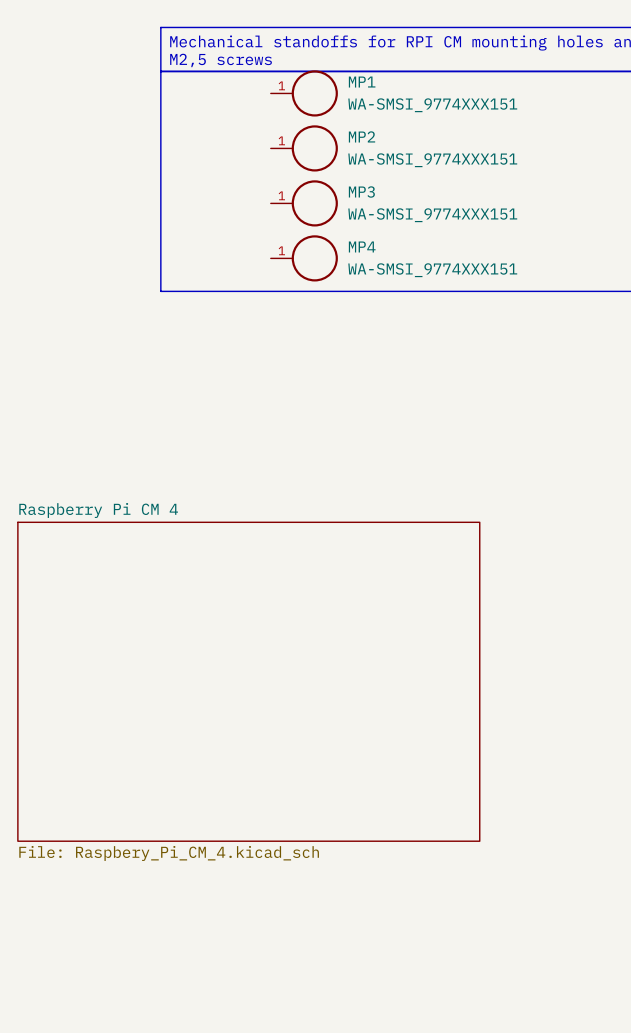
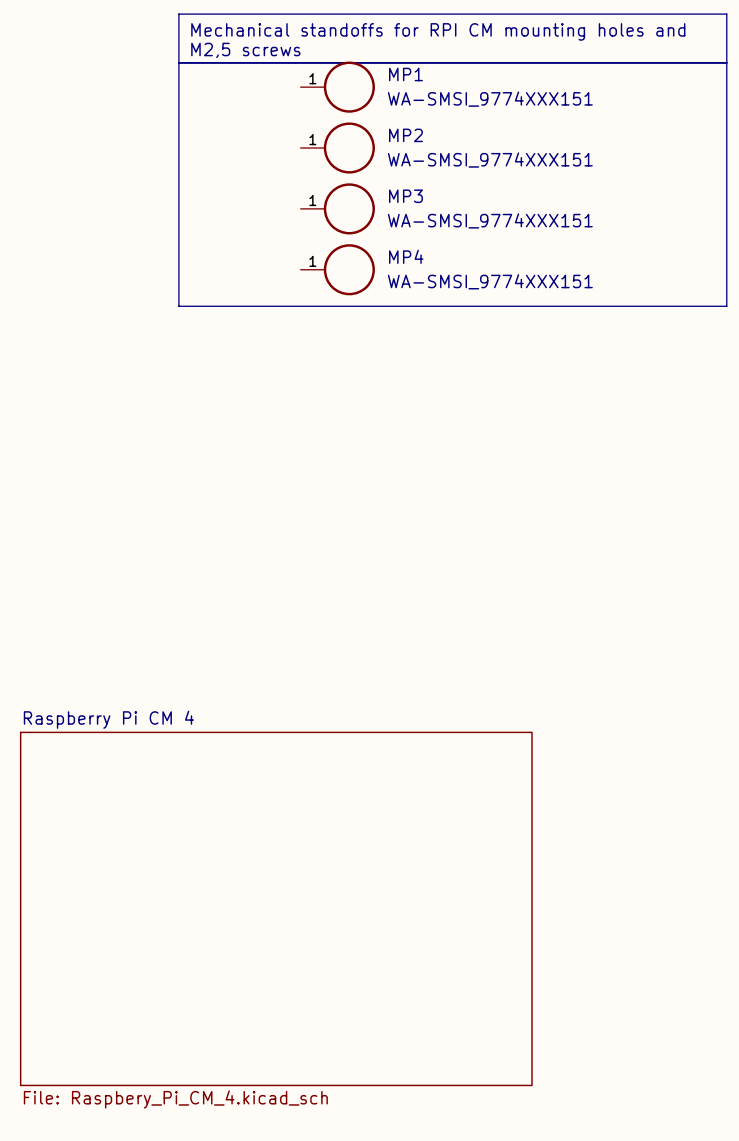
sheet Raspberry Pi CM 4 position: (248, 681) -> (276, 908)

